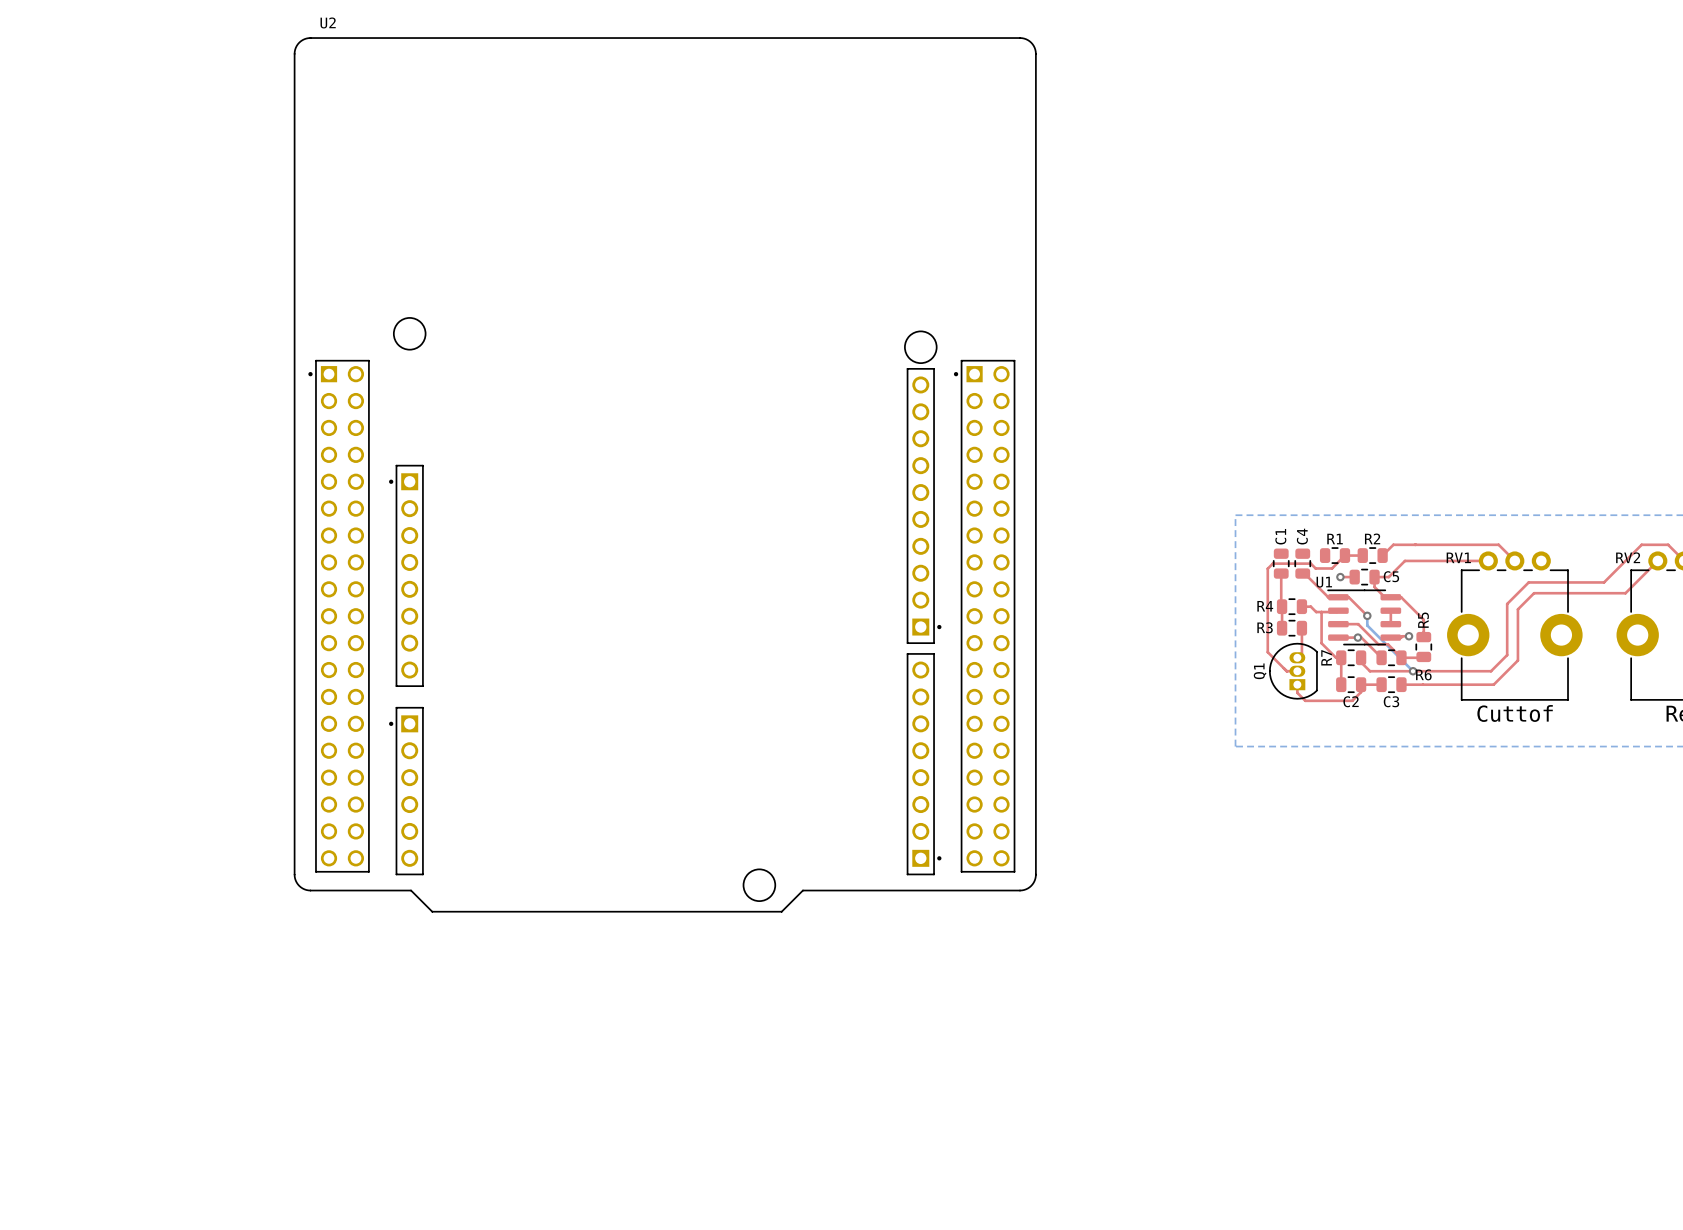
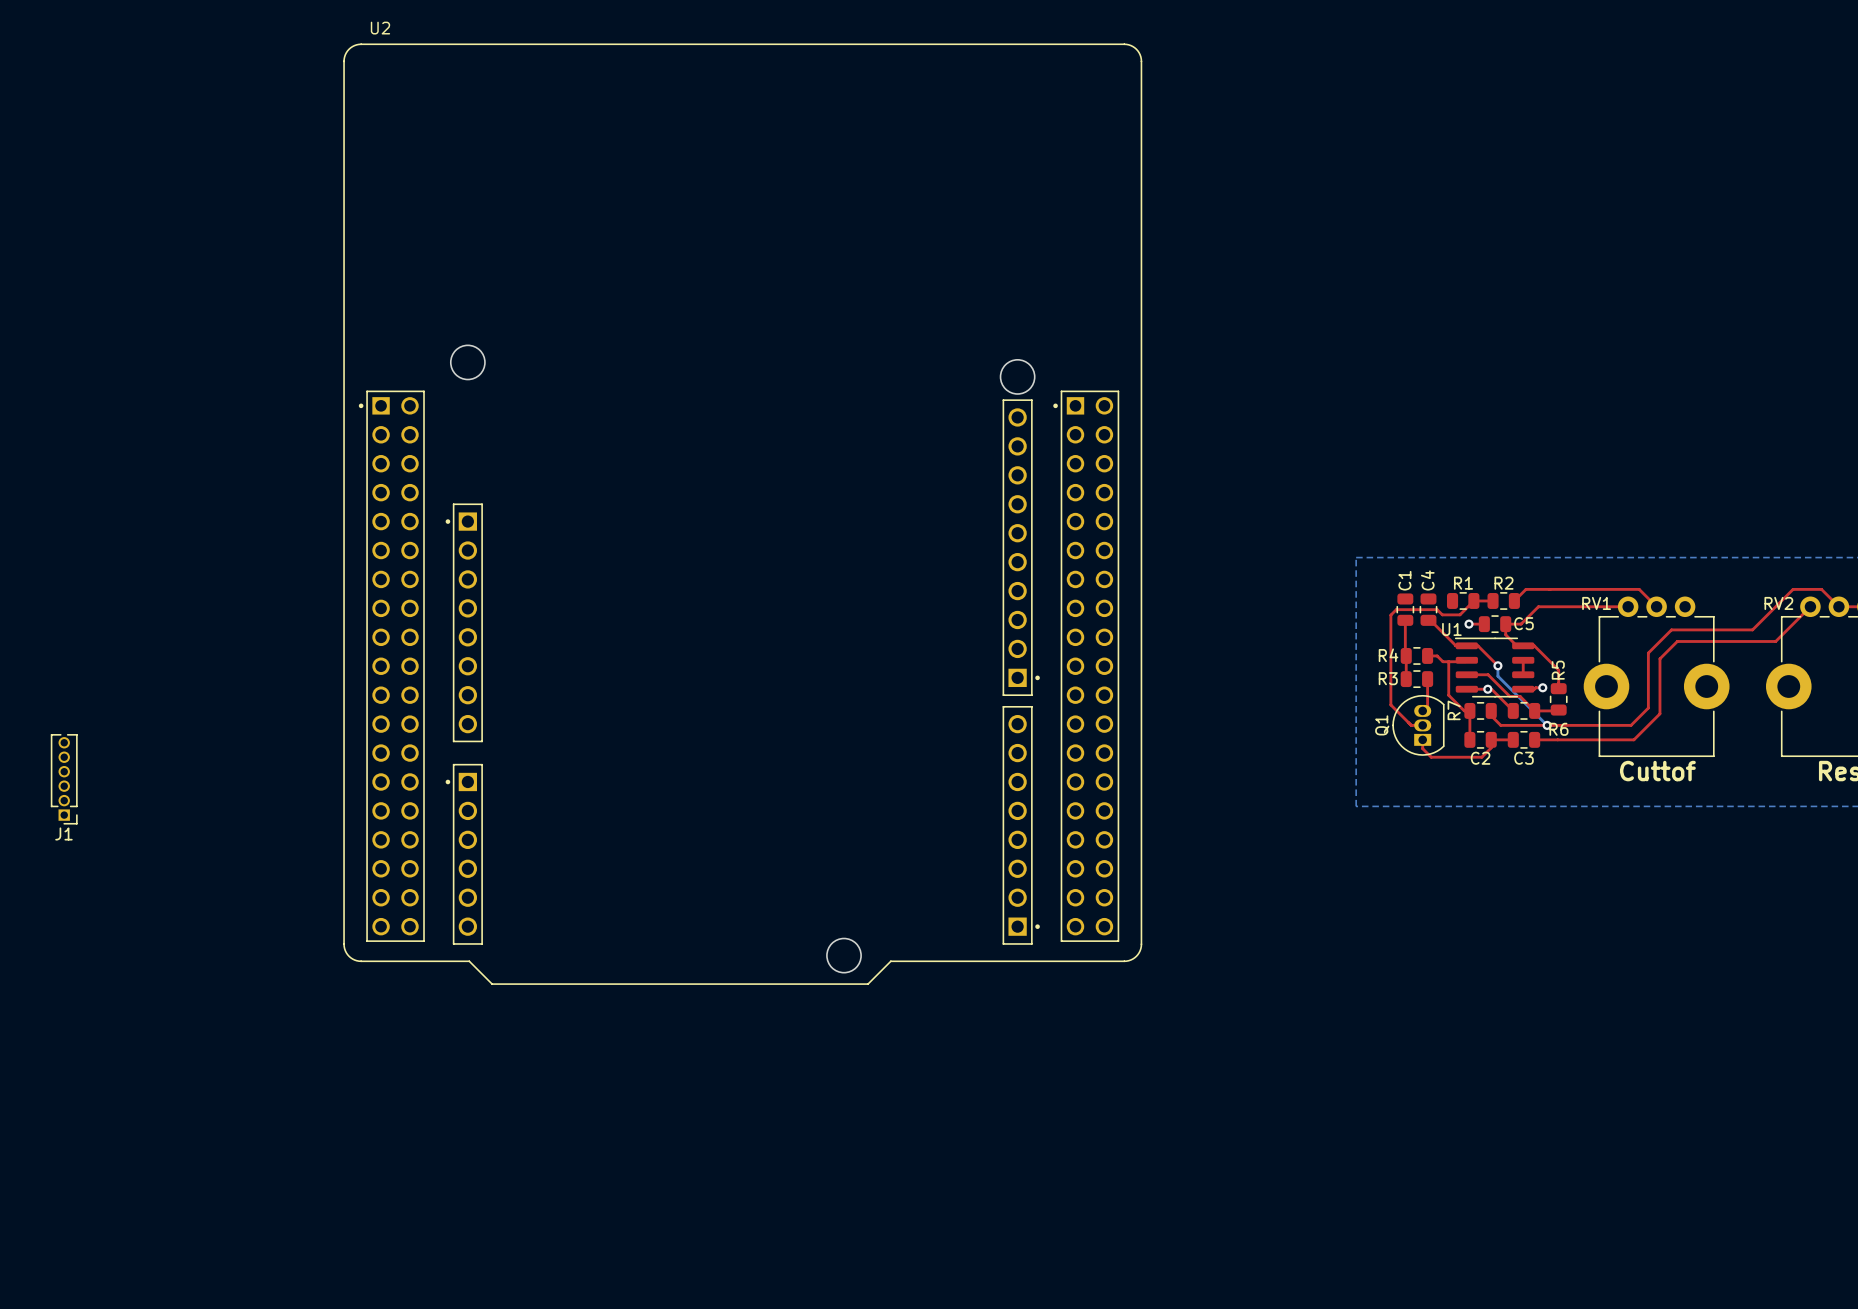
J1: none -> (64, 779)

